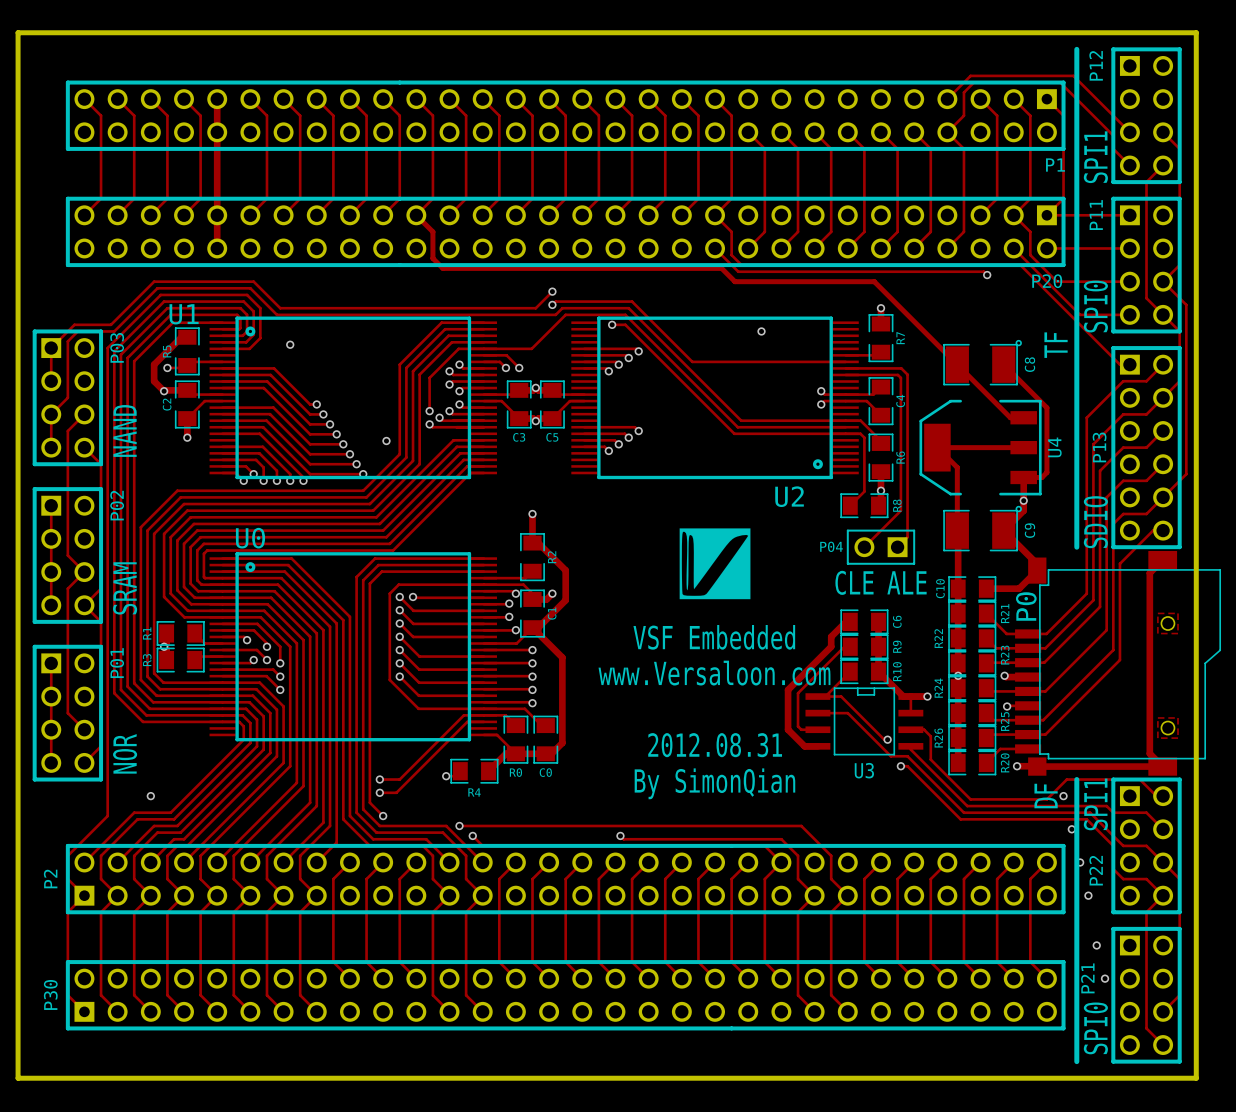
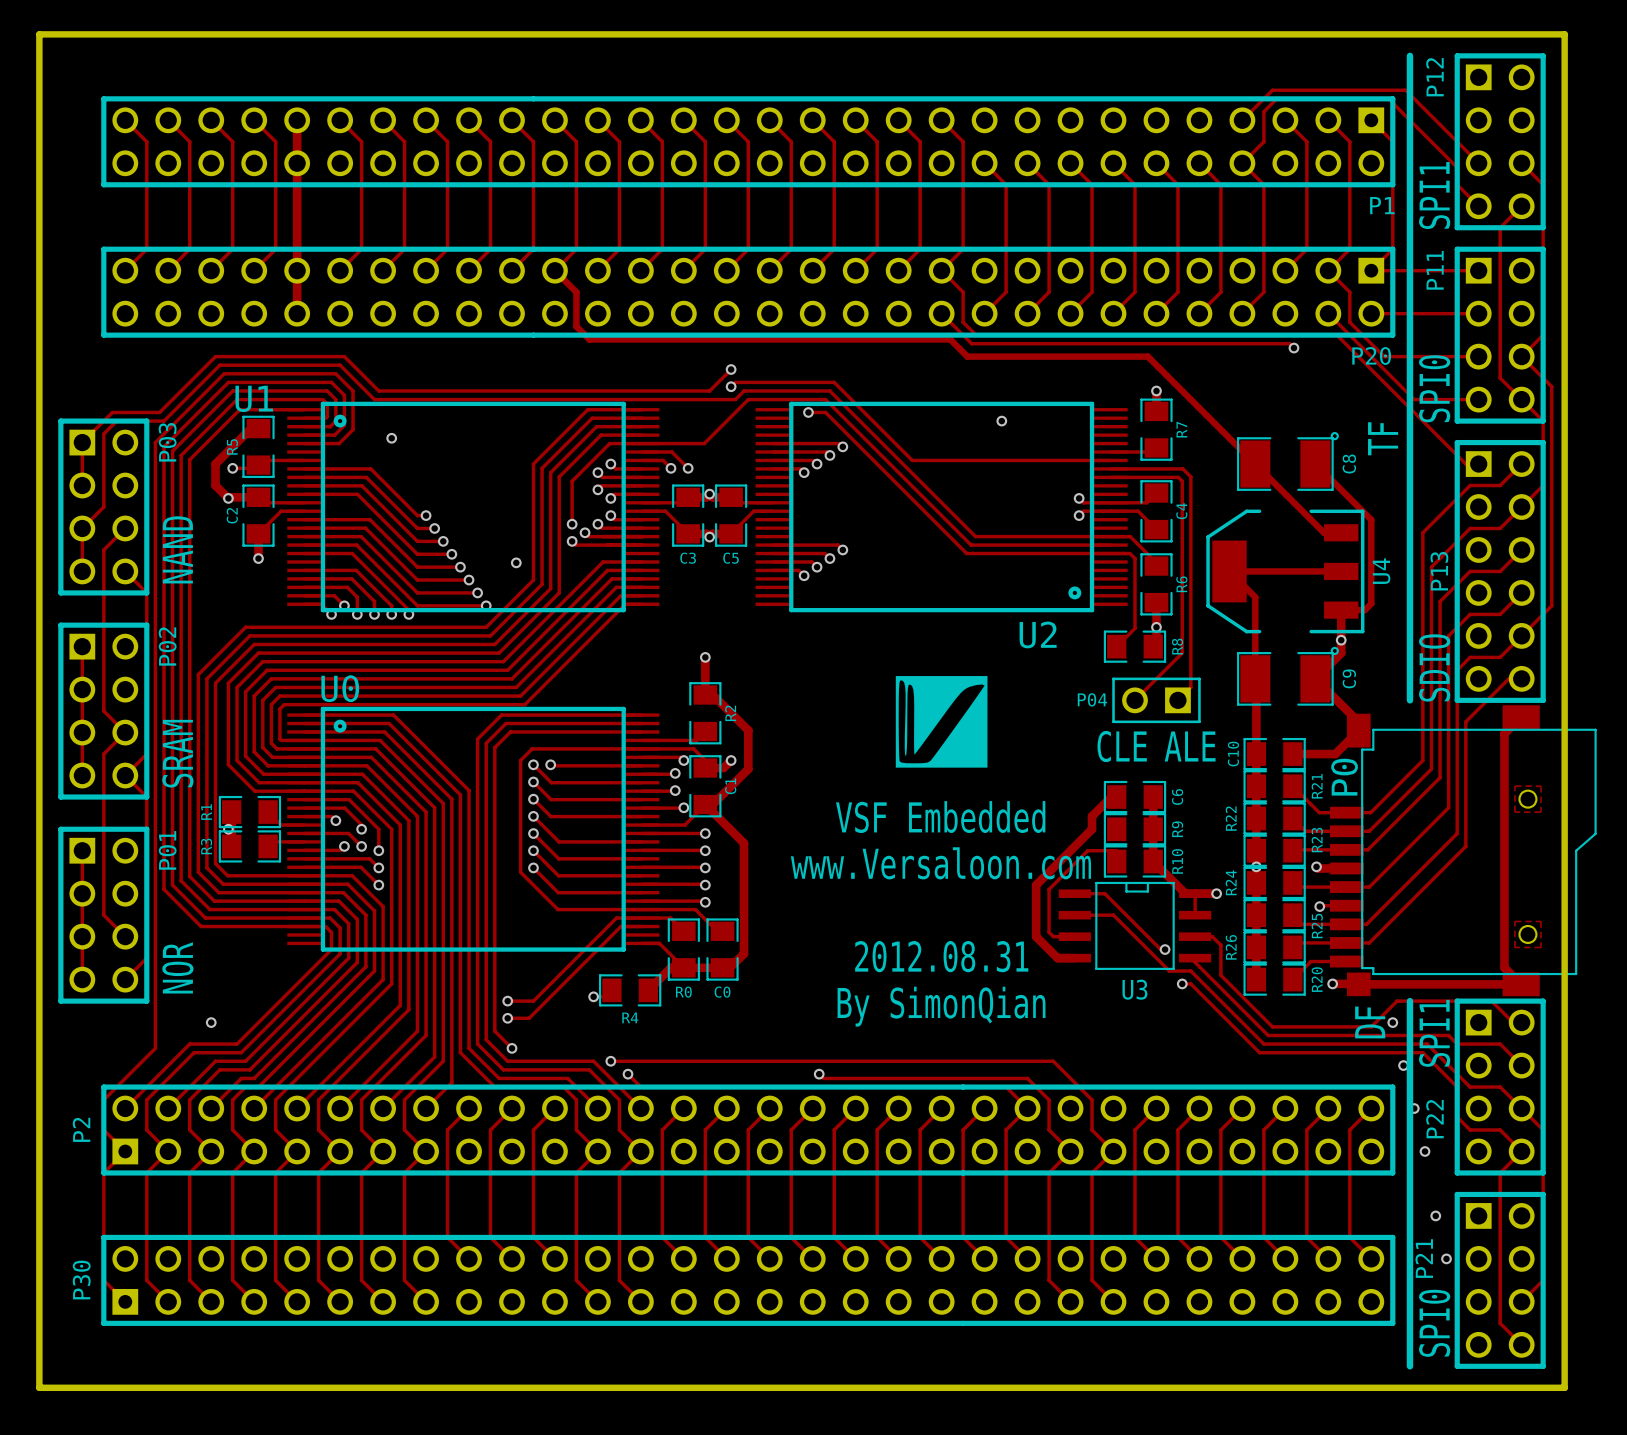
track: (850, 646) (844, 646) (827, 663) -> (1116, 850) (1087, 850)
track: (850, 671) (825, 696) -> none

